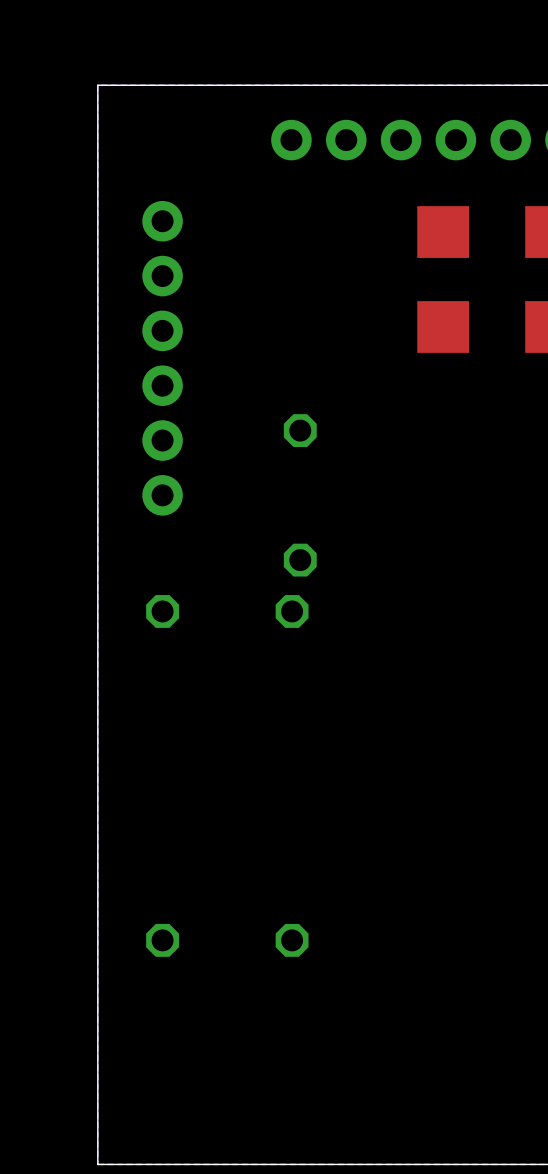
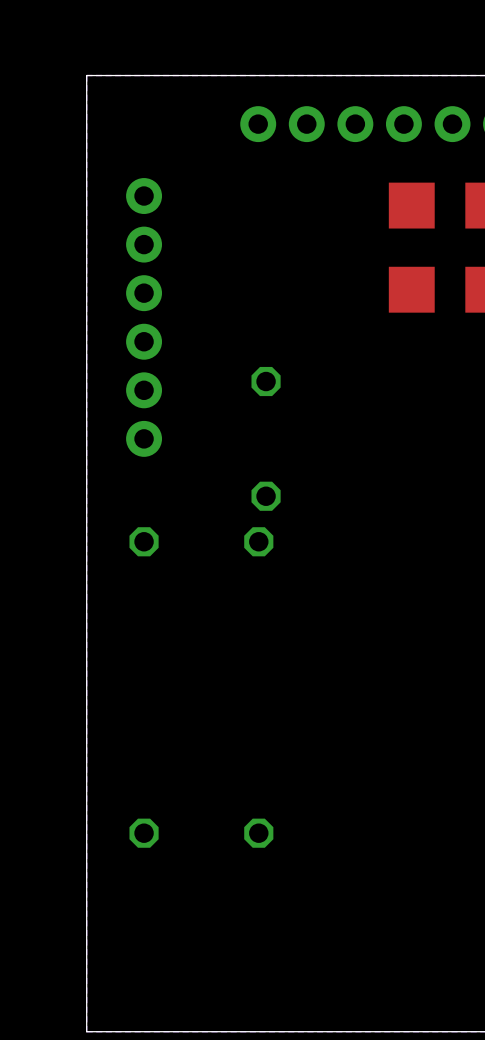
part position: (443, 279) -> (411, 247)

